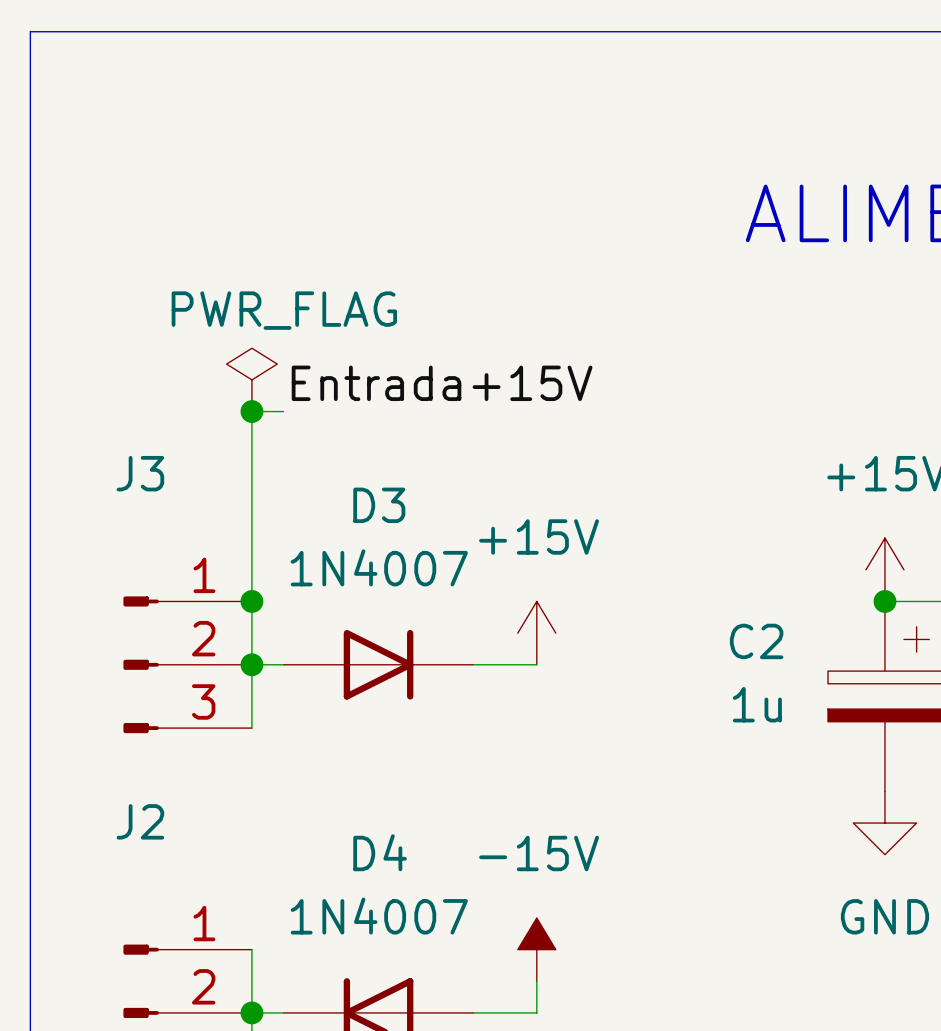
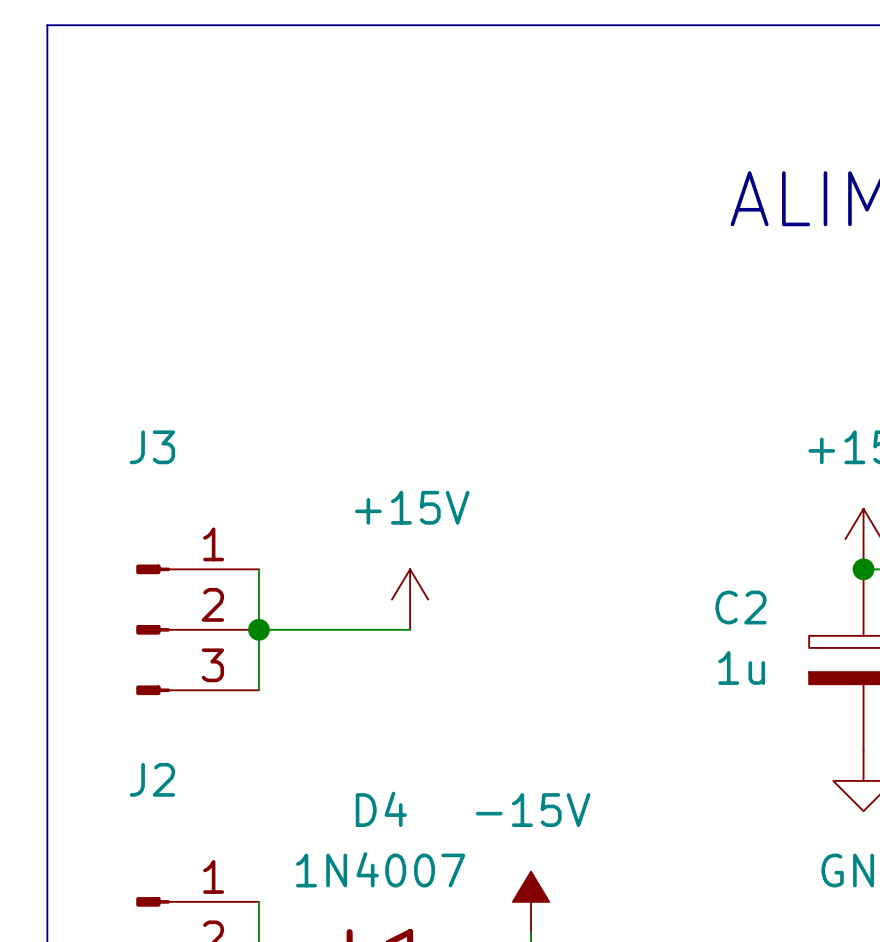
power symbol: PWR_FLAG (251, 379) -> none
label: Entrada+15V (442, 383) -> none
junction: (251, 411) -> none
wire: (283, 411) (251, 411) (251, 601) -> none
junction: (251, 601) -> none
power symbol position: +15V (536, 633) -> +15V (410, 599)
D3: 1N4007 (378, 664) -> none
wire: (473, 664) (536, 664) -> none

